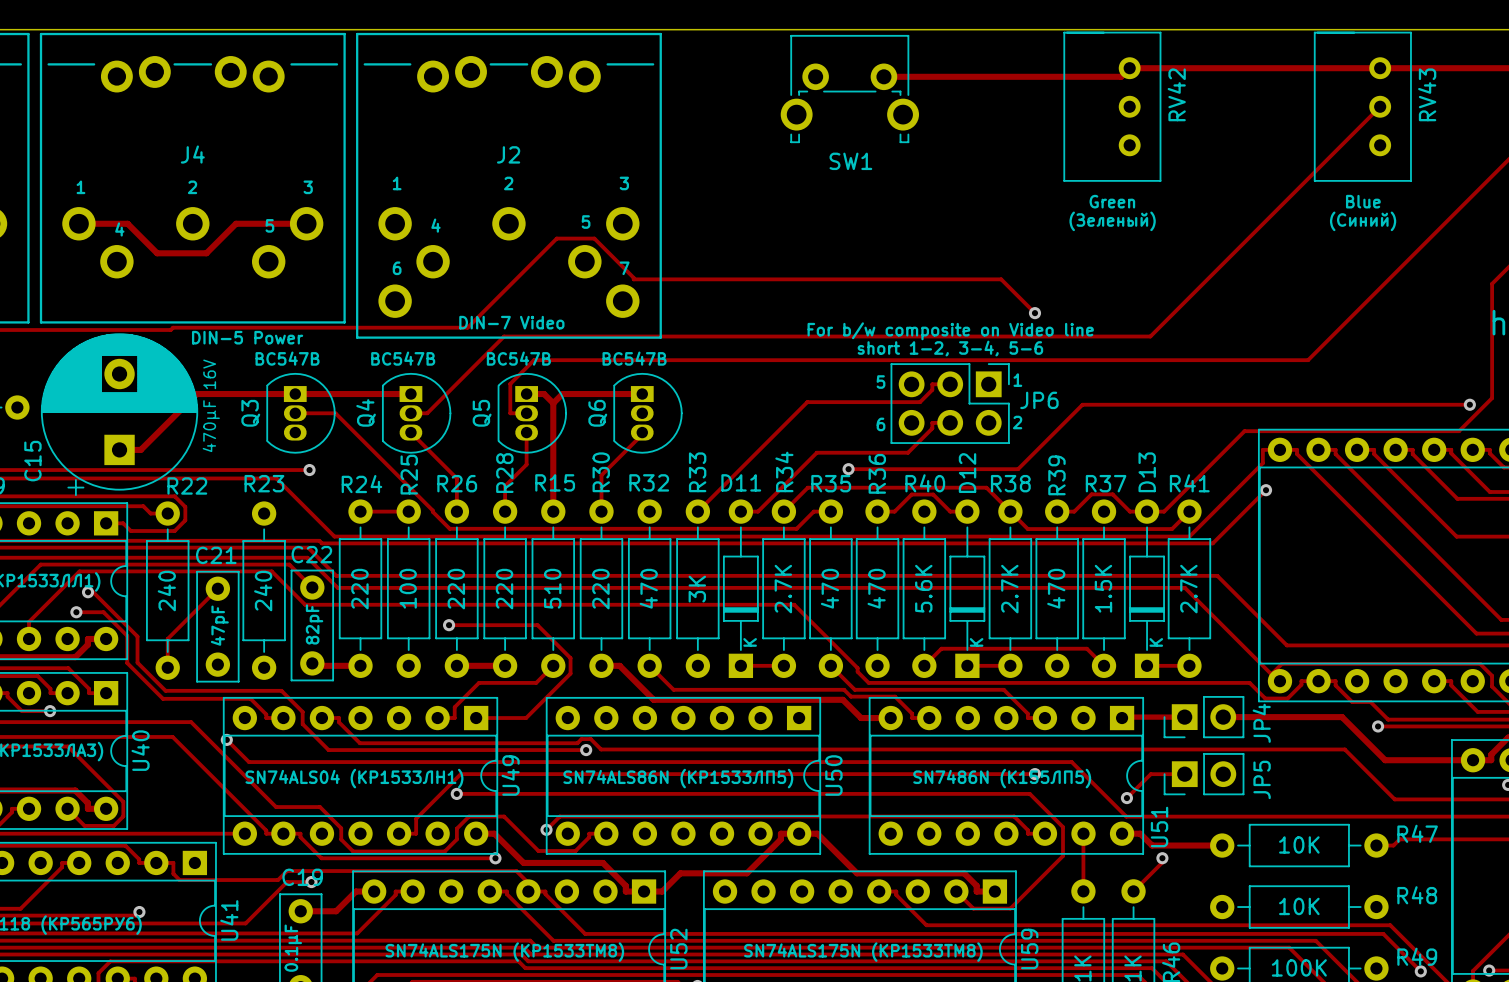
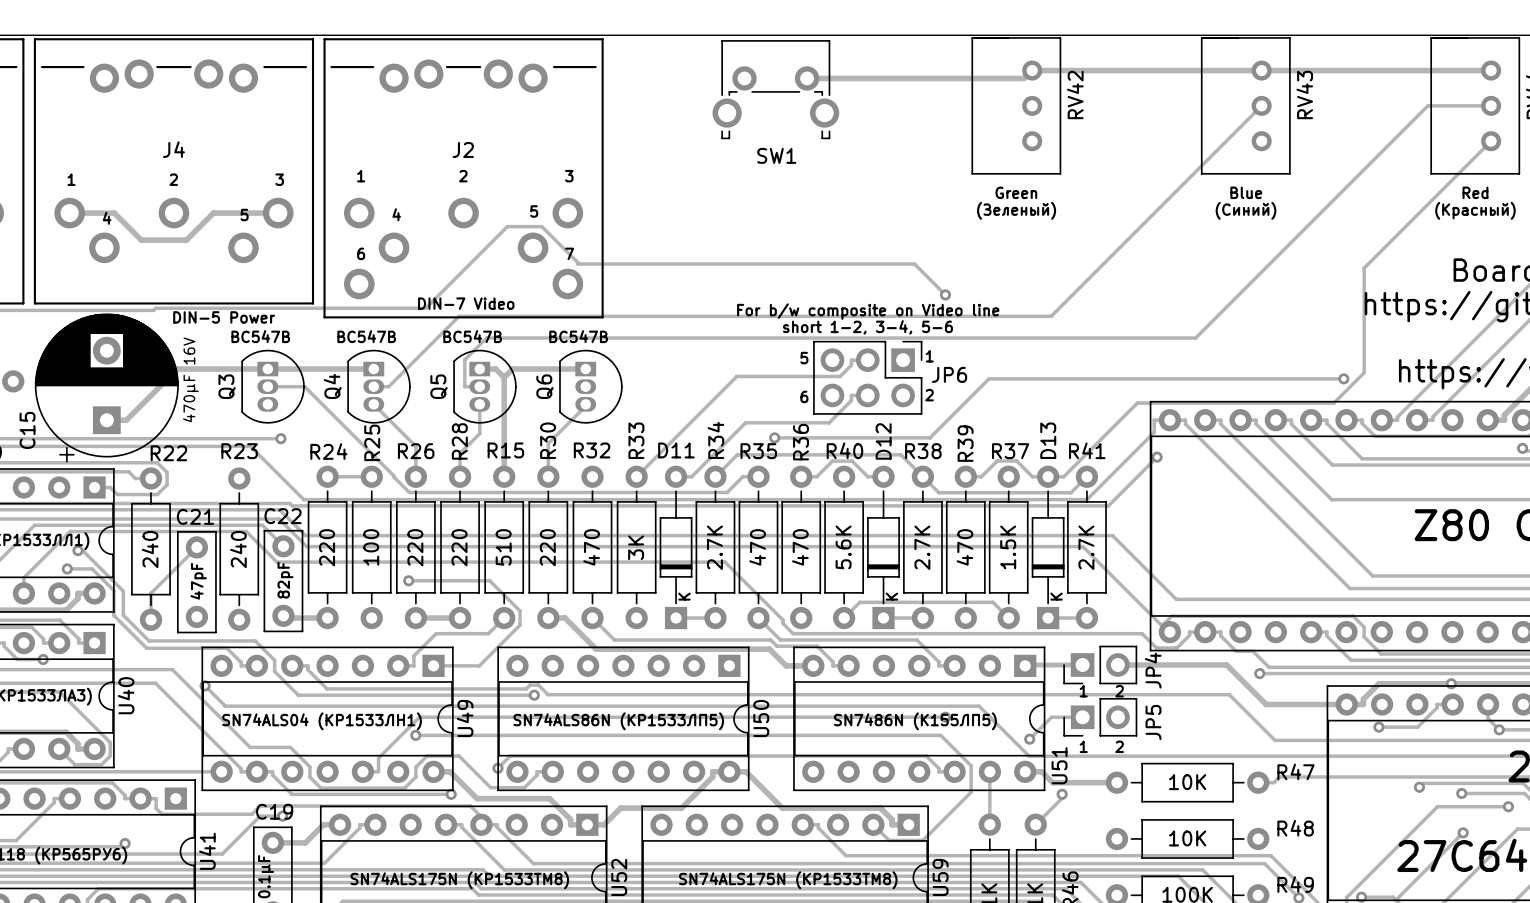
text: none -> 1 (1083, 691)
text: none -> 2 (1119, 691)
text: none -> 1 (1083, 746)
text: none -> 2 (1119, 746)

